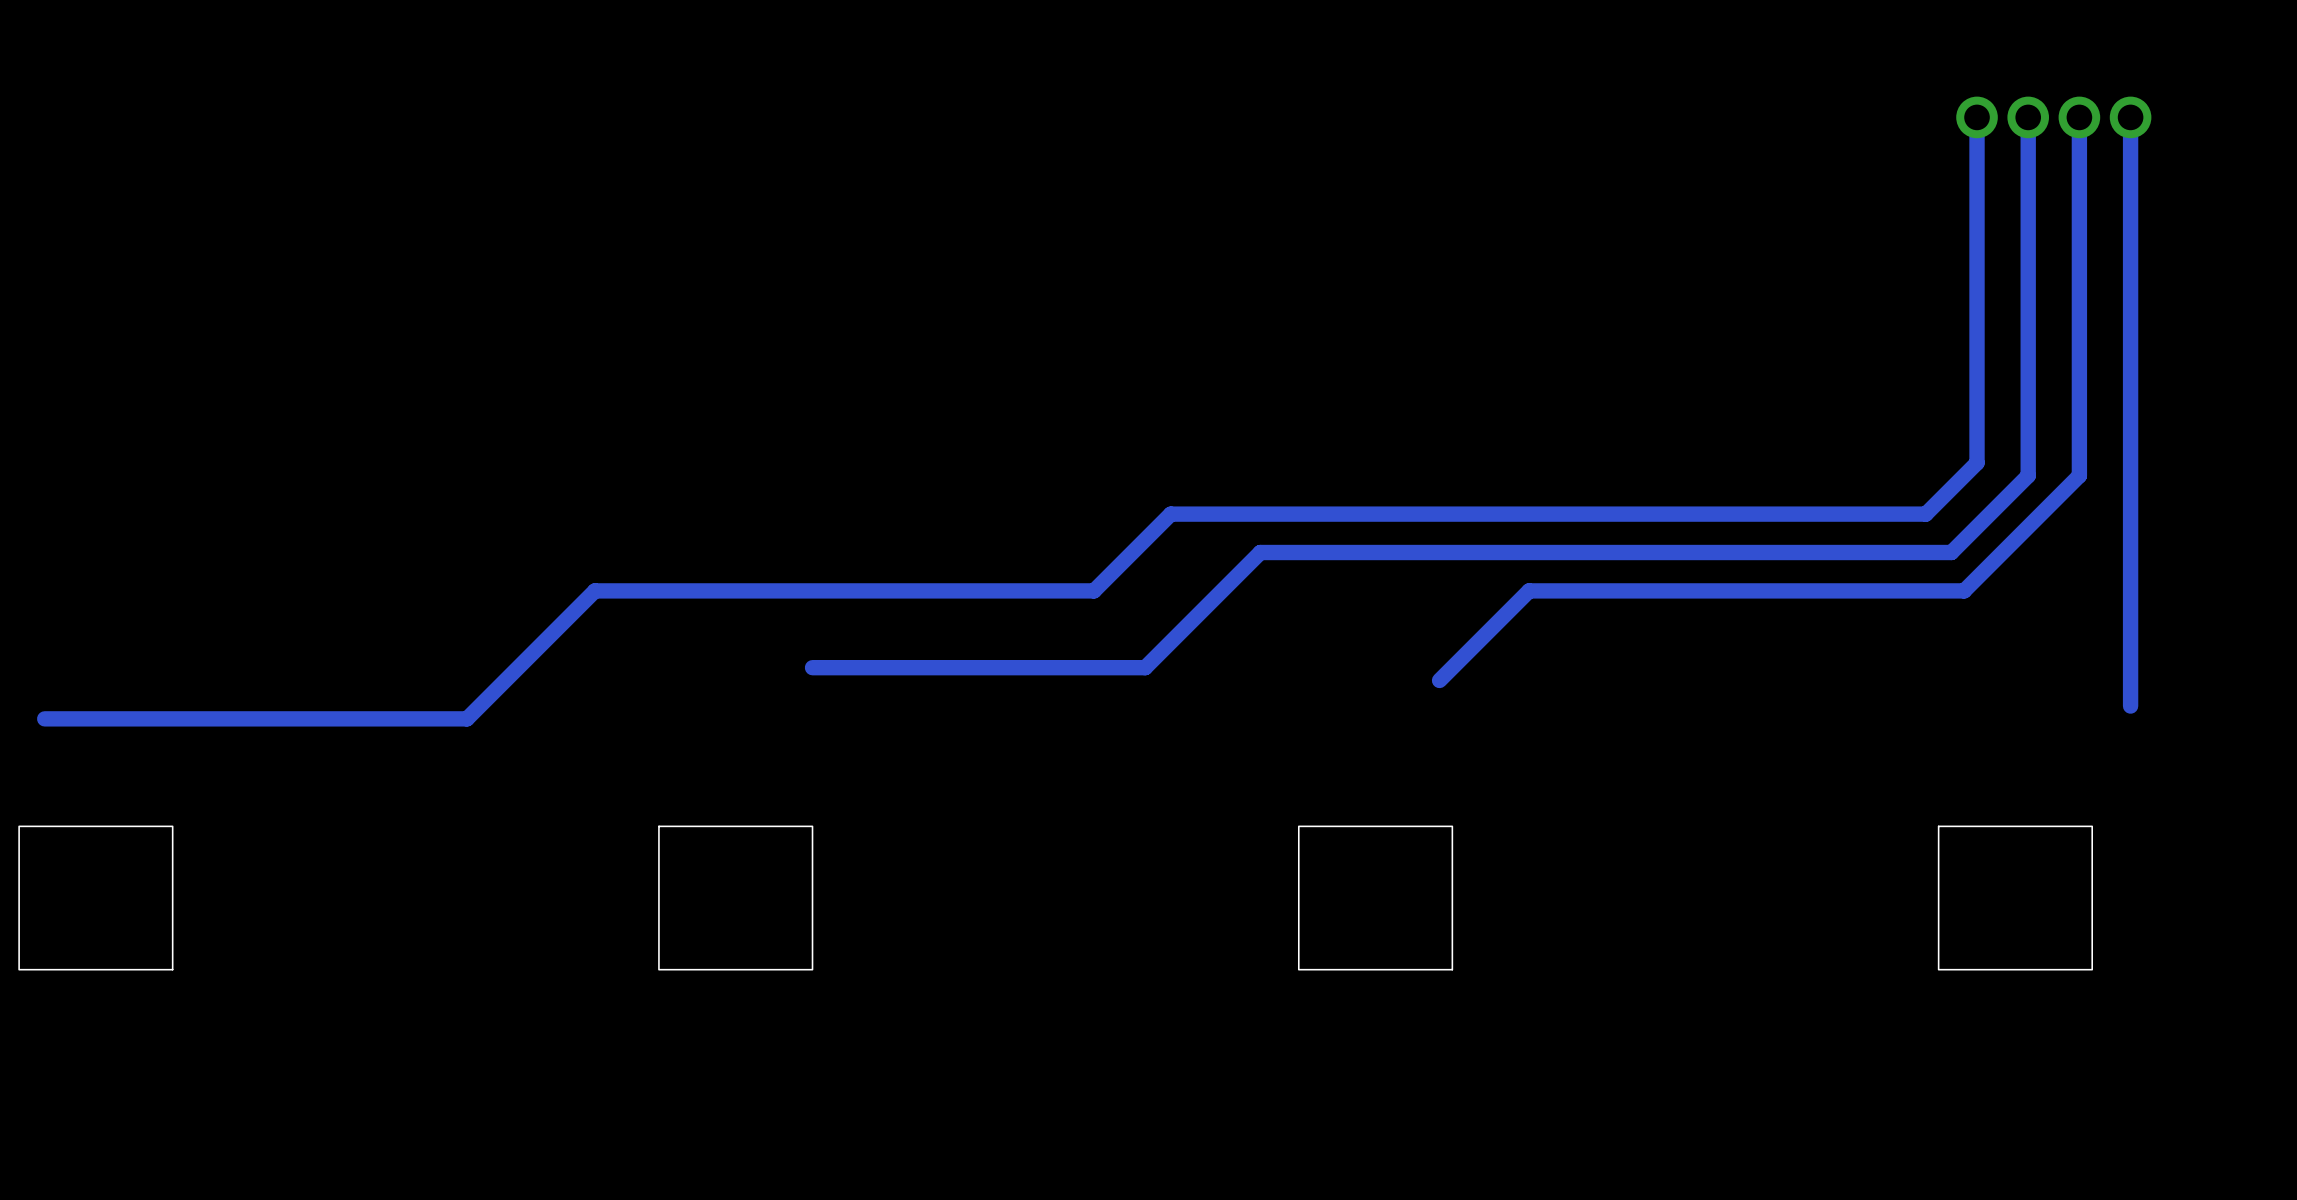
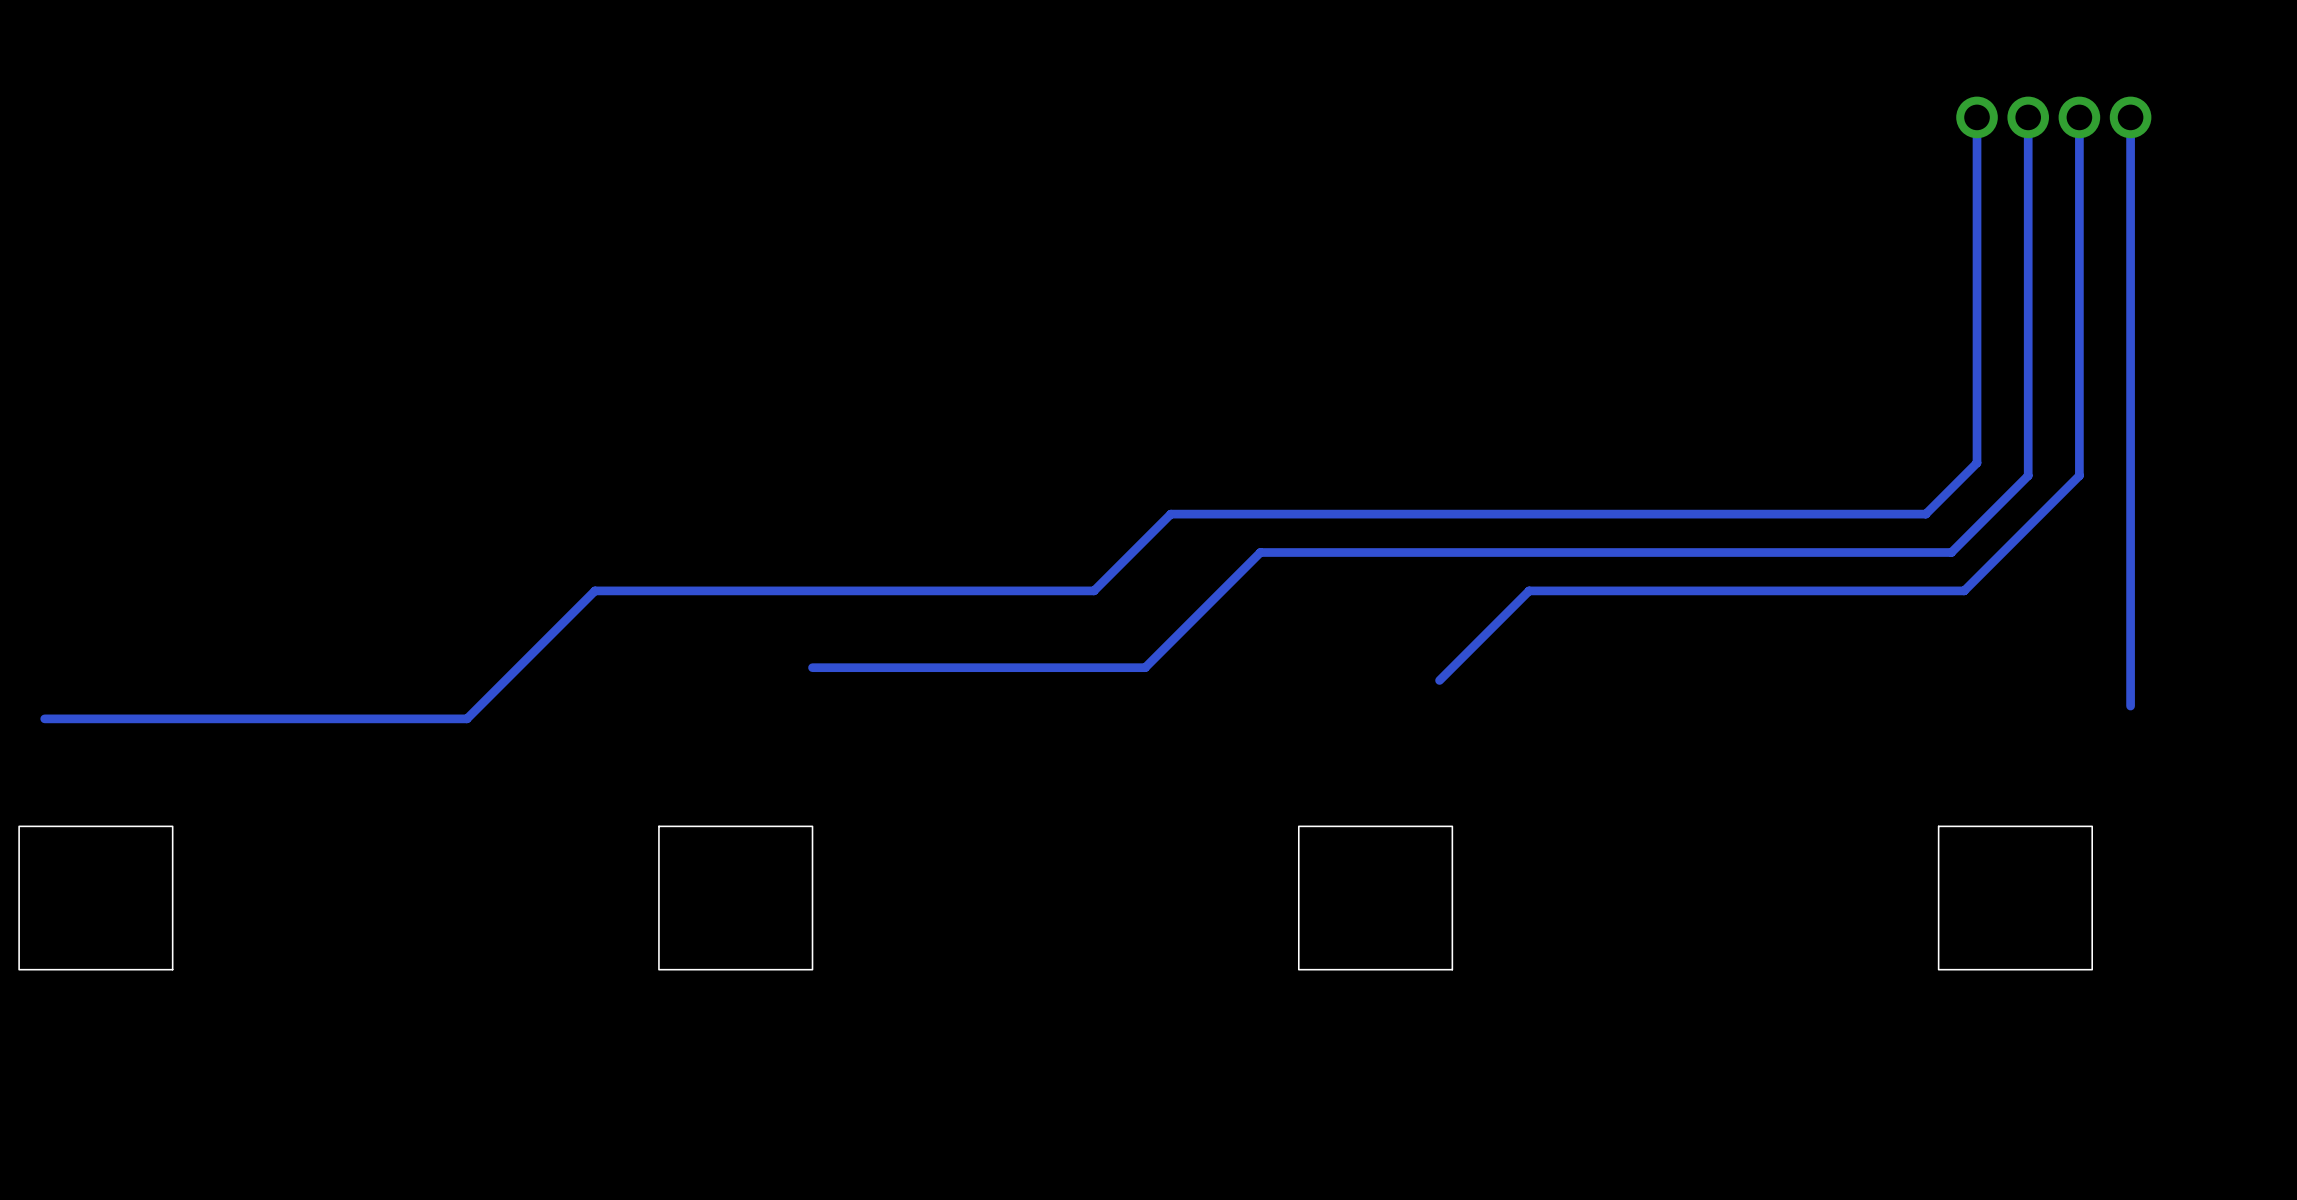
track width: thick (1977, 117) (1977, 462) (1925, 514) (1170, 514) (1094, 590) (594, 590) (466, 718) (44, 718) -> thin (1977, 117) (1977, 462) (1925, 514) (1170, 514) (1094, 590) (594, 590) (466, 718) (44, 718)
track width: thick (2028, 117) (2028, 475) (1951, 552) (1260, 552) (1145, 667) (812, 667) -> thin (2028, 117) (2028, 475) (1951, 552) (1260, 552) (1145, 667) (812, 667)
track width: thick (2079, 117) (2079, 475) (1964, 590) (1529, 590) (1439, 680) -> thin (2079, 117) (2079, 475) (1964, 590) (1529, 590) (1439, 680)
track width: thick (2130, 117) (2130, 706) -> thin (2130, 117) (2130, 706)

